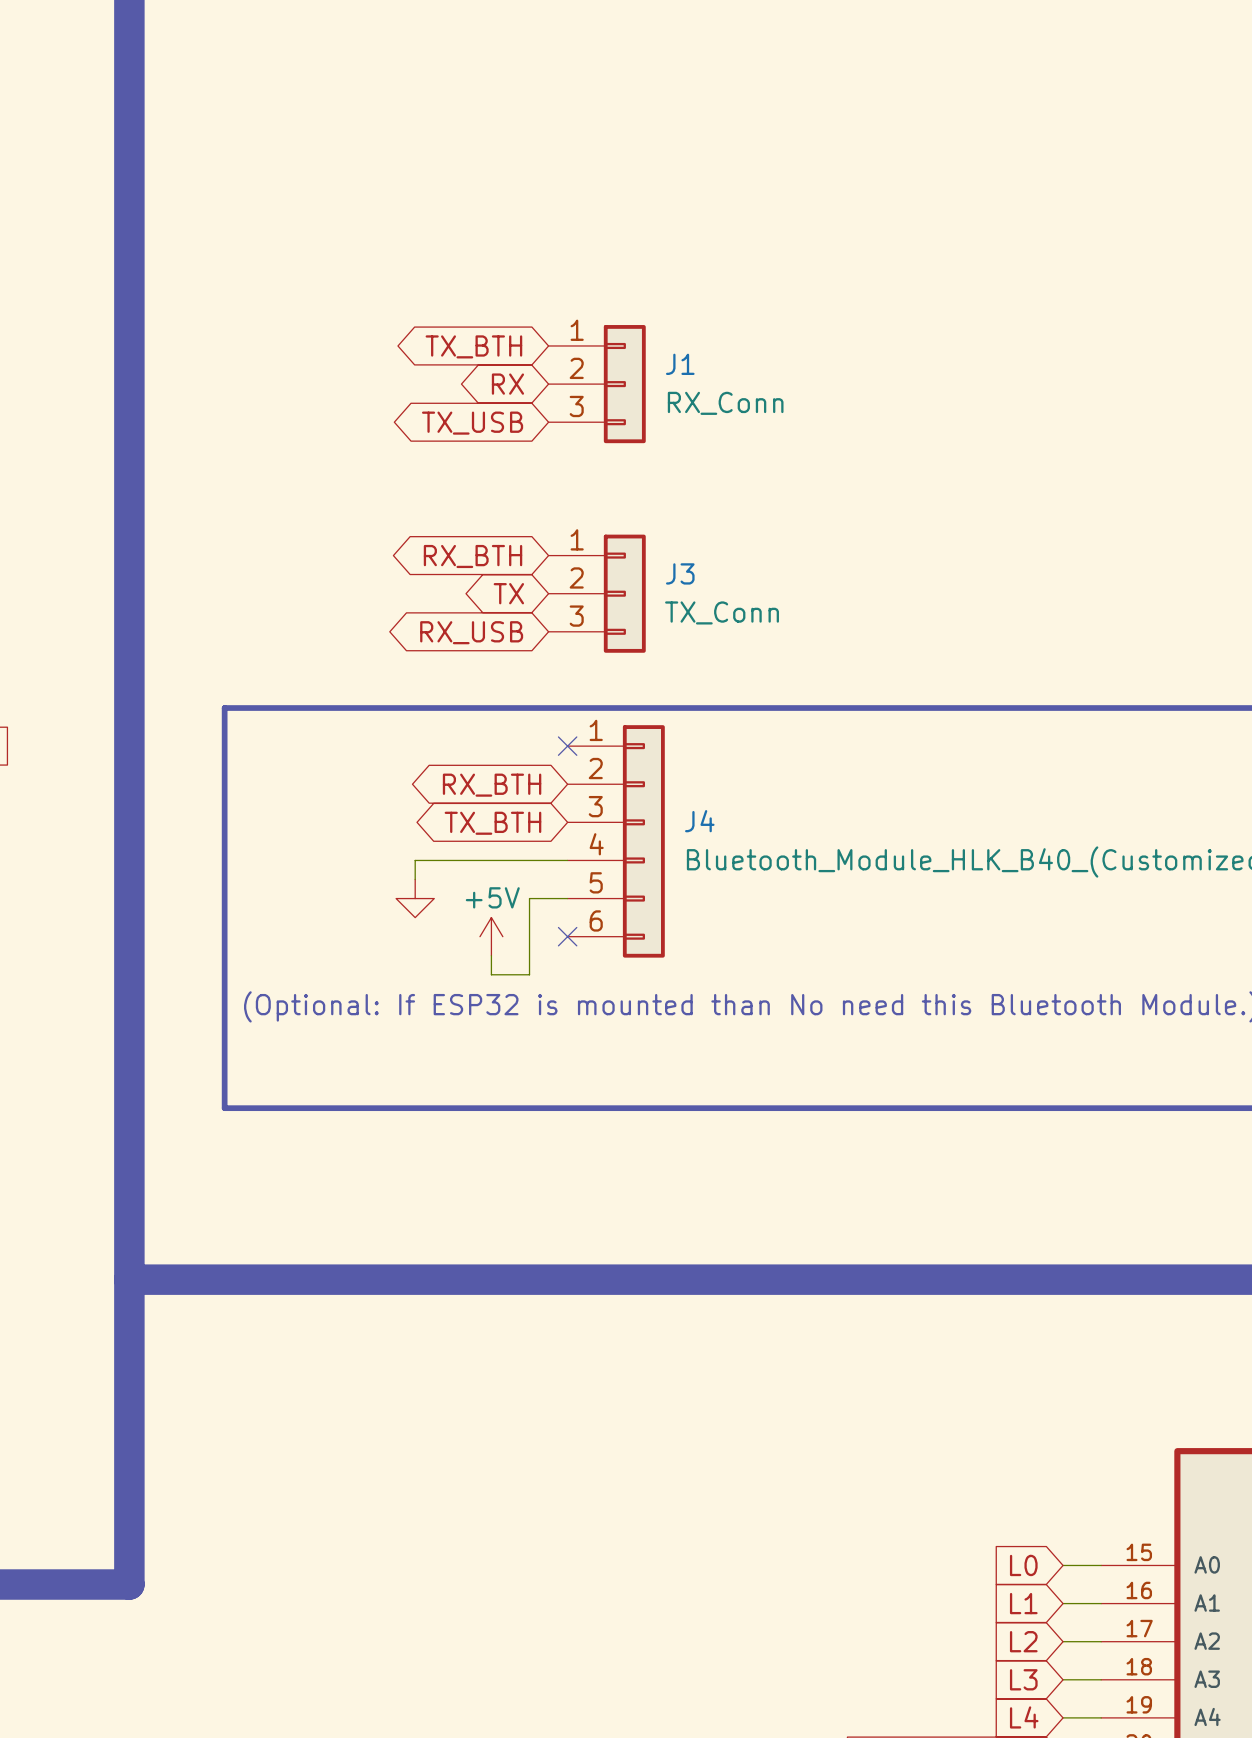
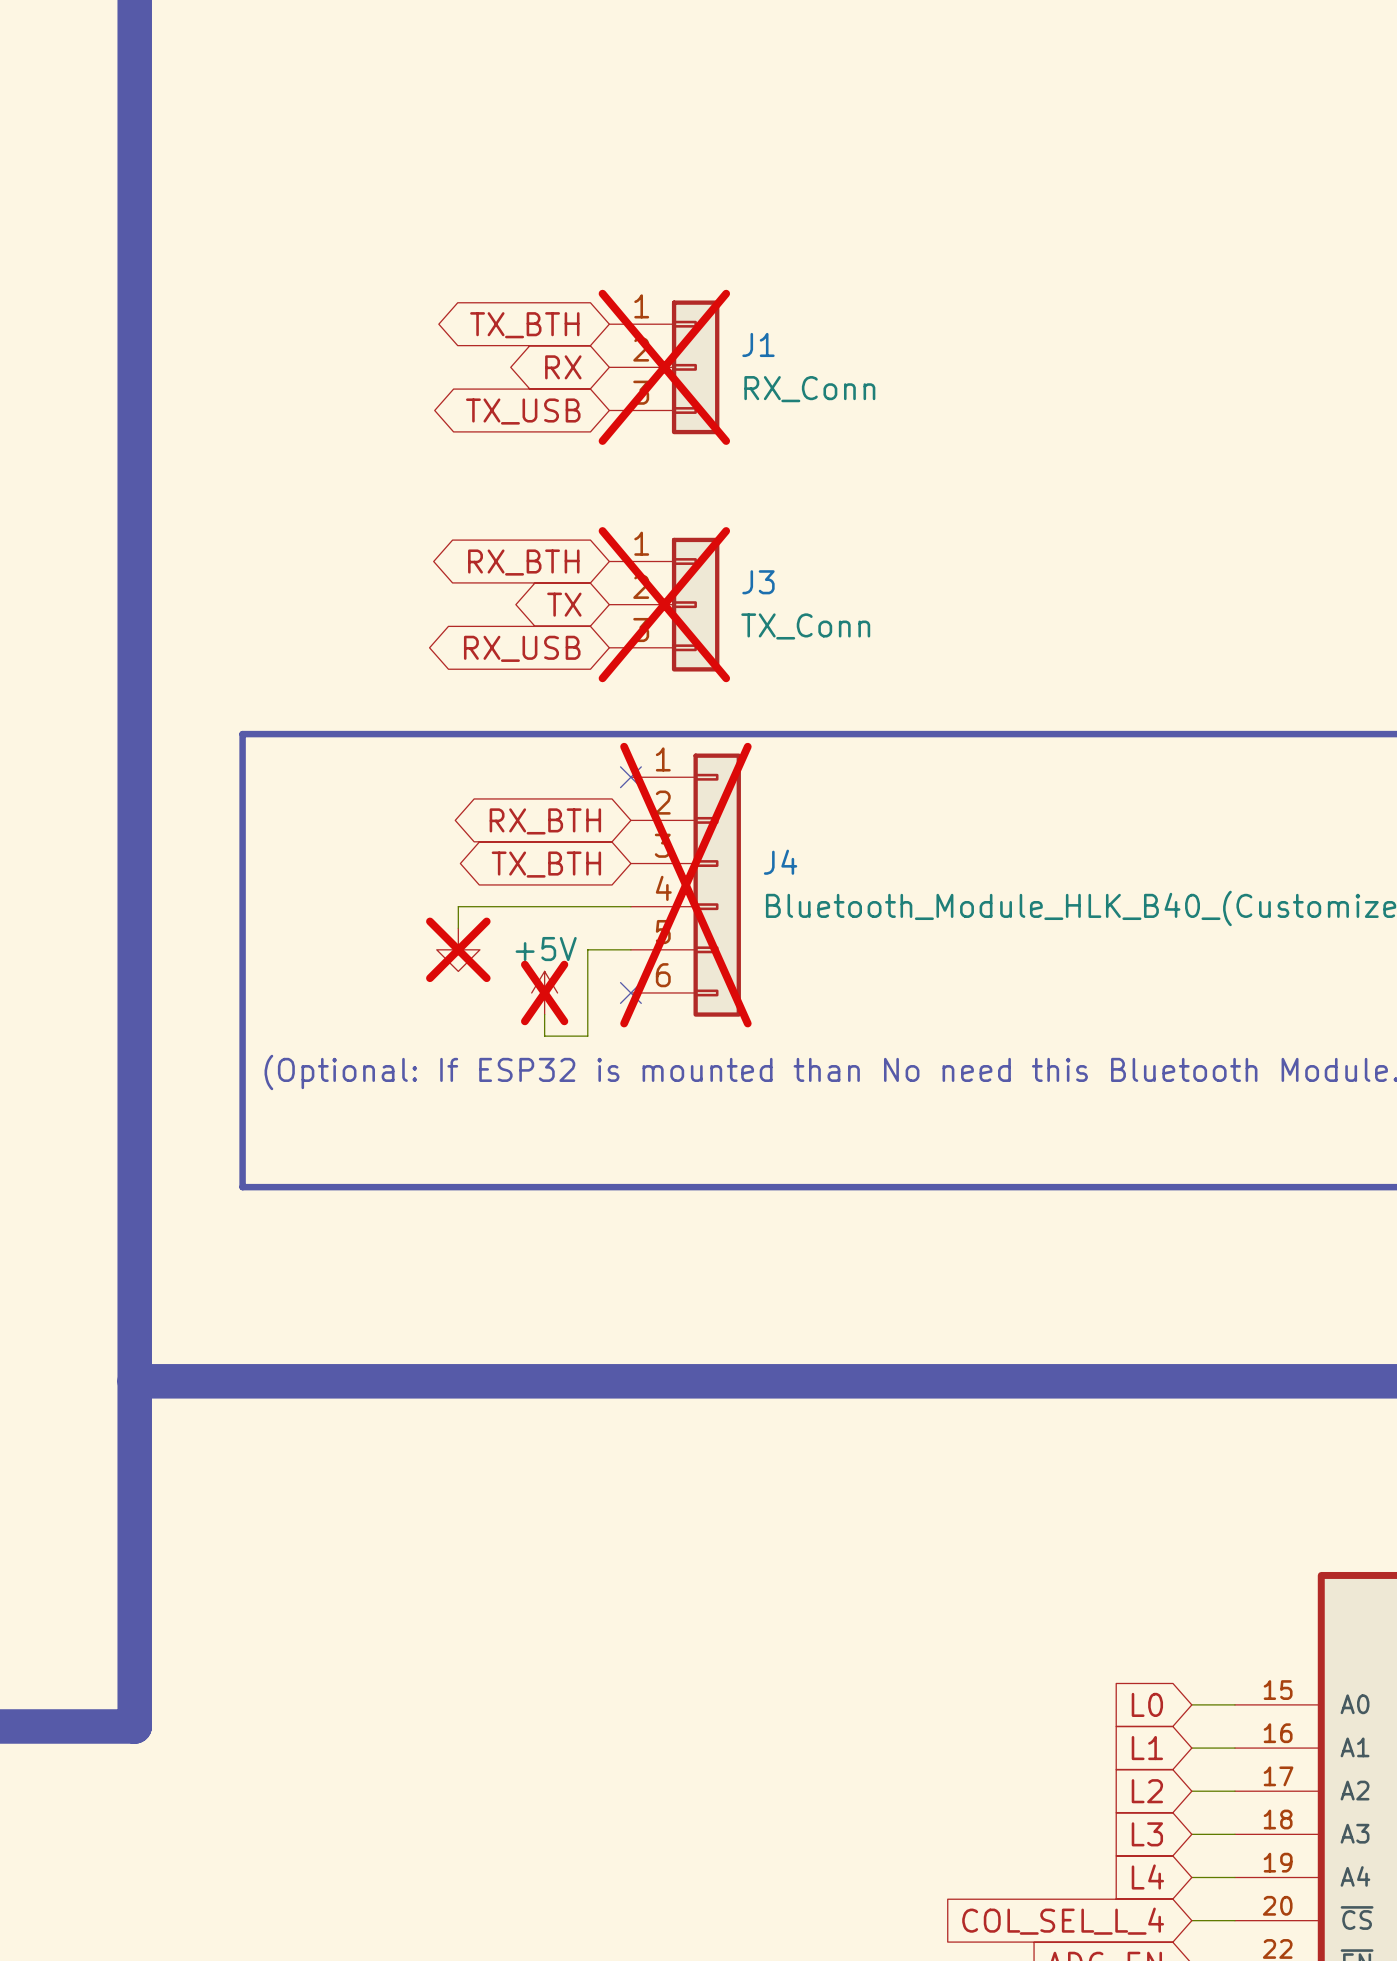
J1 do-not-place cross: none -> (664, 367)
J3 do-not-place cross: none -> (664, 604)
J4 do-not-place cross: none -> (685, 885)
power symbol do-not-place cross: none -> (458, 949)
power symbol do-not-place cross: none -> (544, 992)

